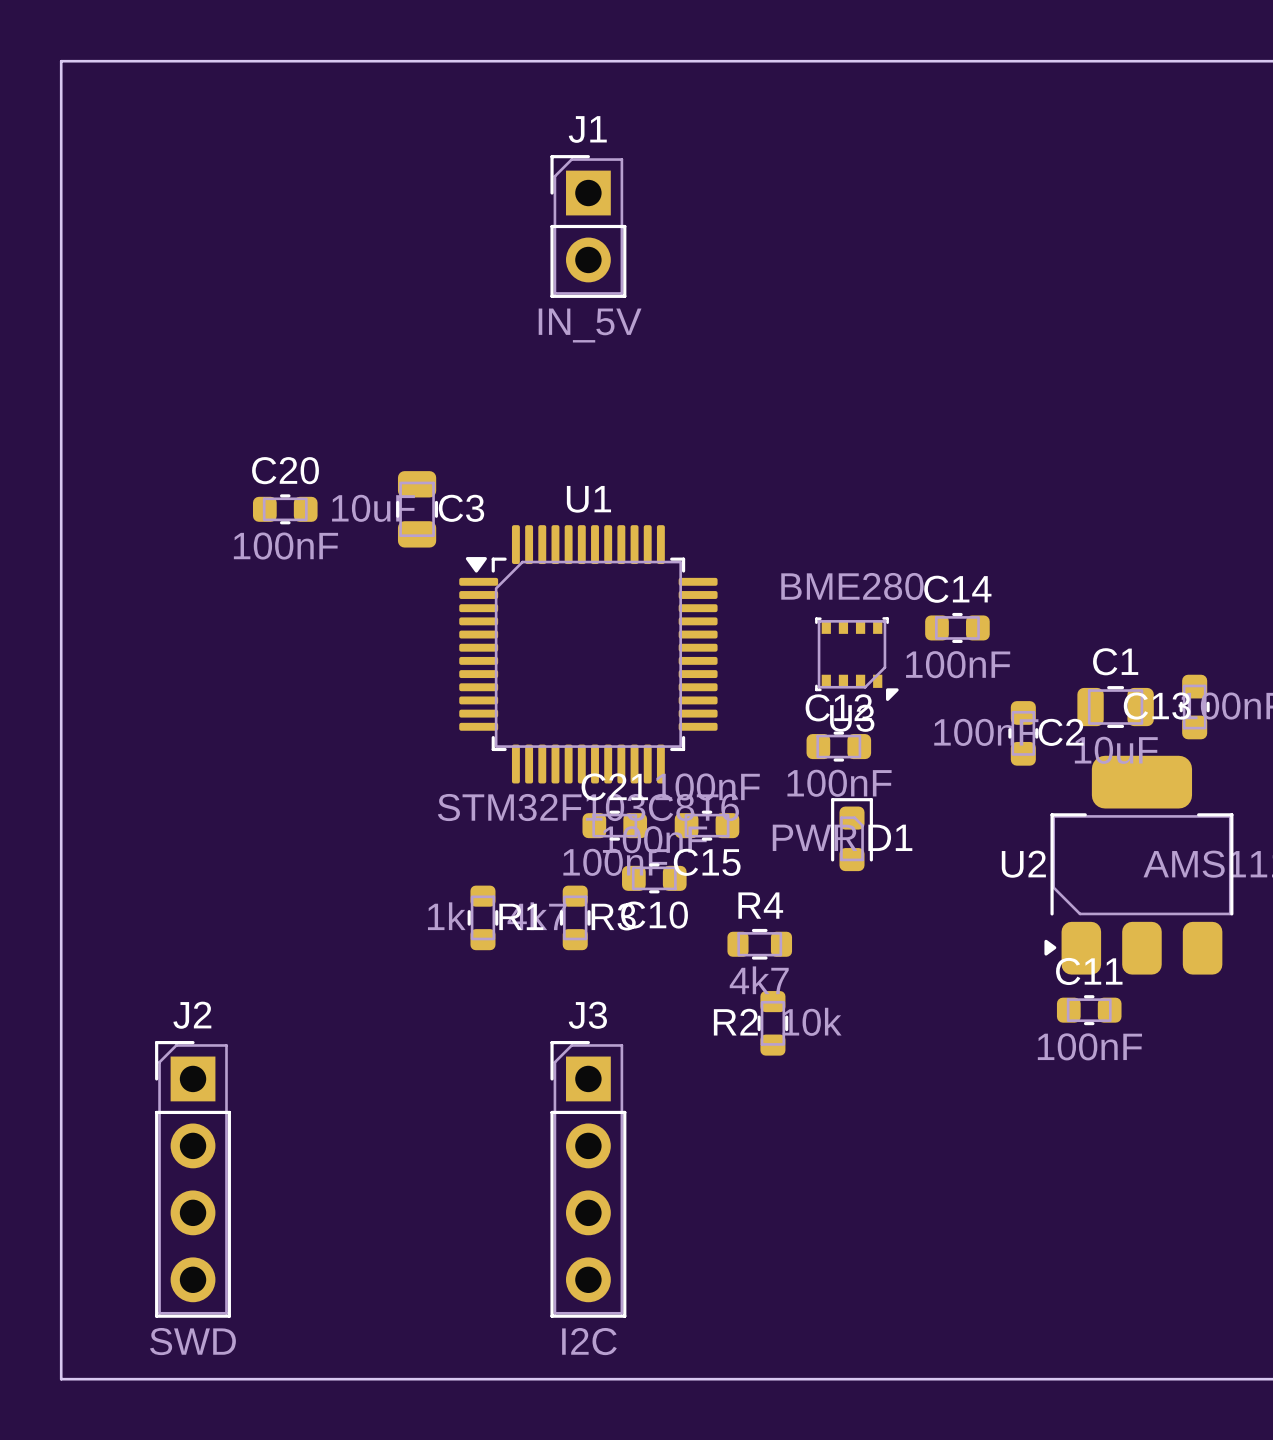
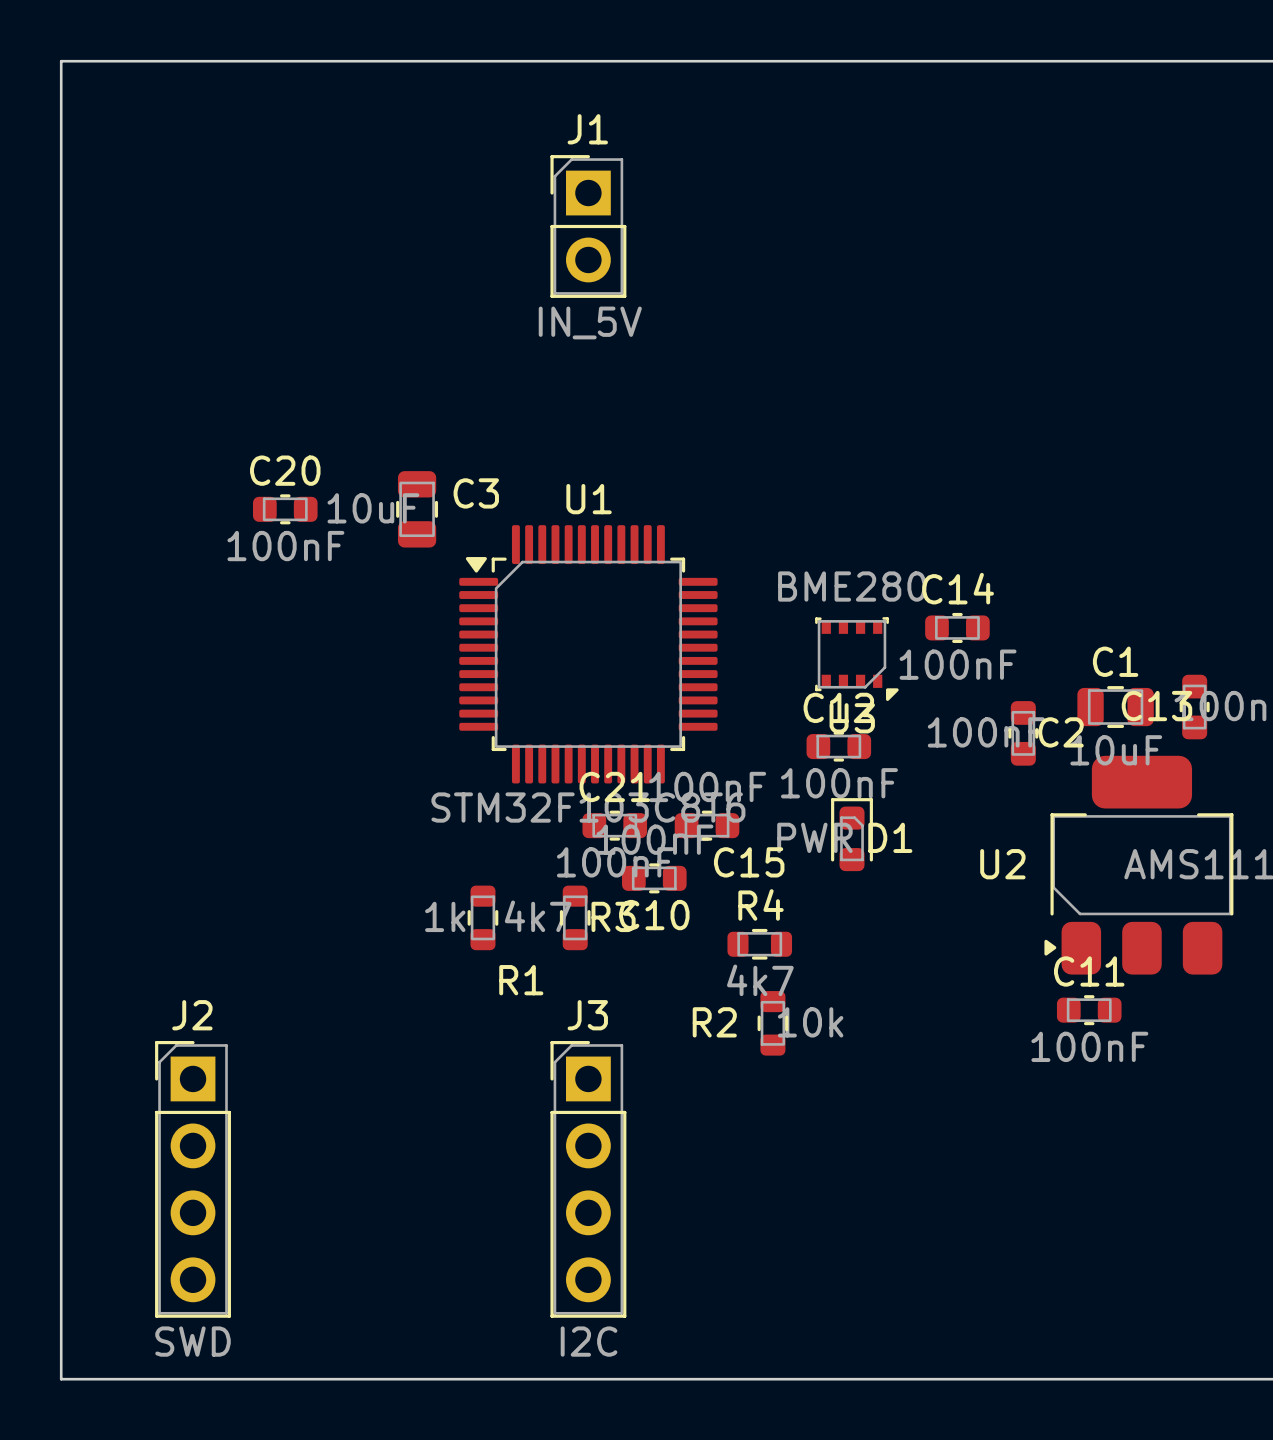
C3 name position: C3 (461, 508) -> C3 (476, 493)
C15 name position: C15 (707, 862) -> C15 (749, 862)
U2 name position: U2 (1023, 864) -> U2 (1002, 864)
R1 name position: R1 (521, 916) -> R1 (521, 980)
R2 name position: R2 (735, 1022) -> R2 (714, 1022)

